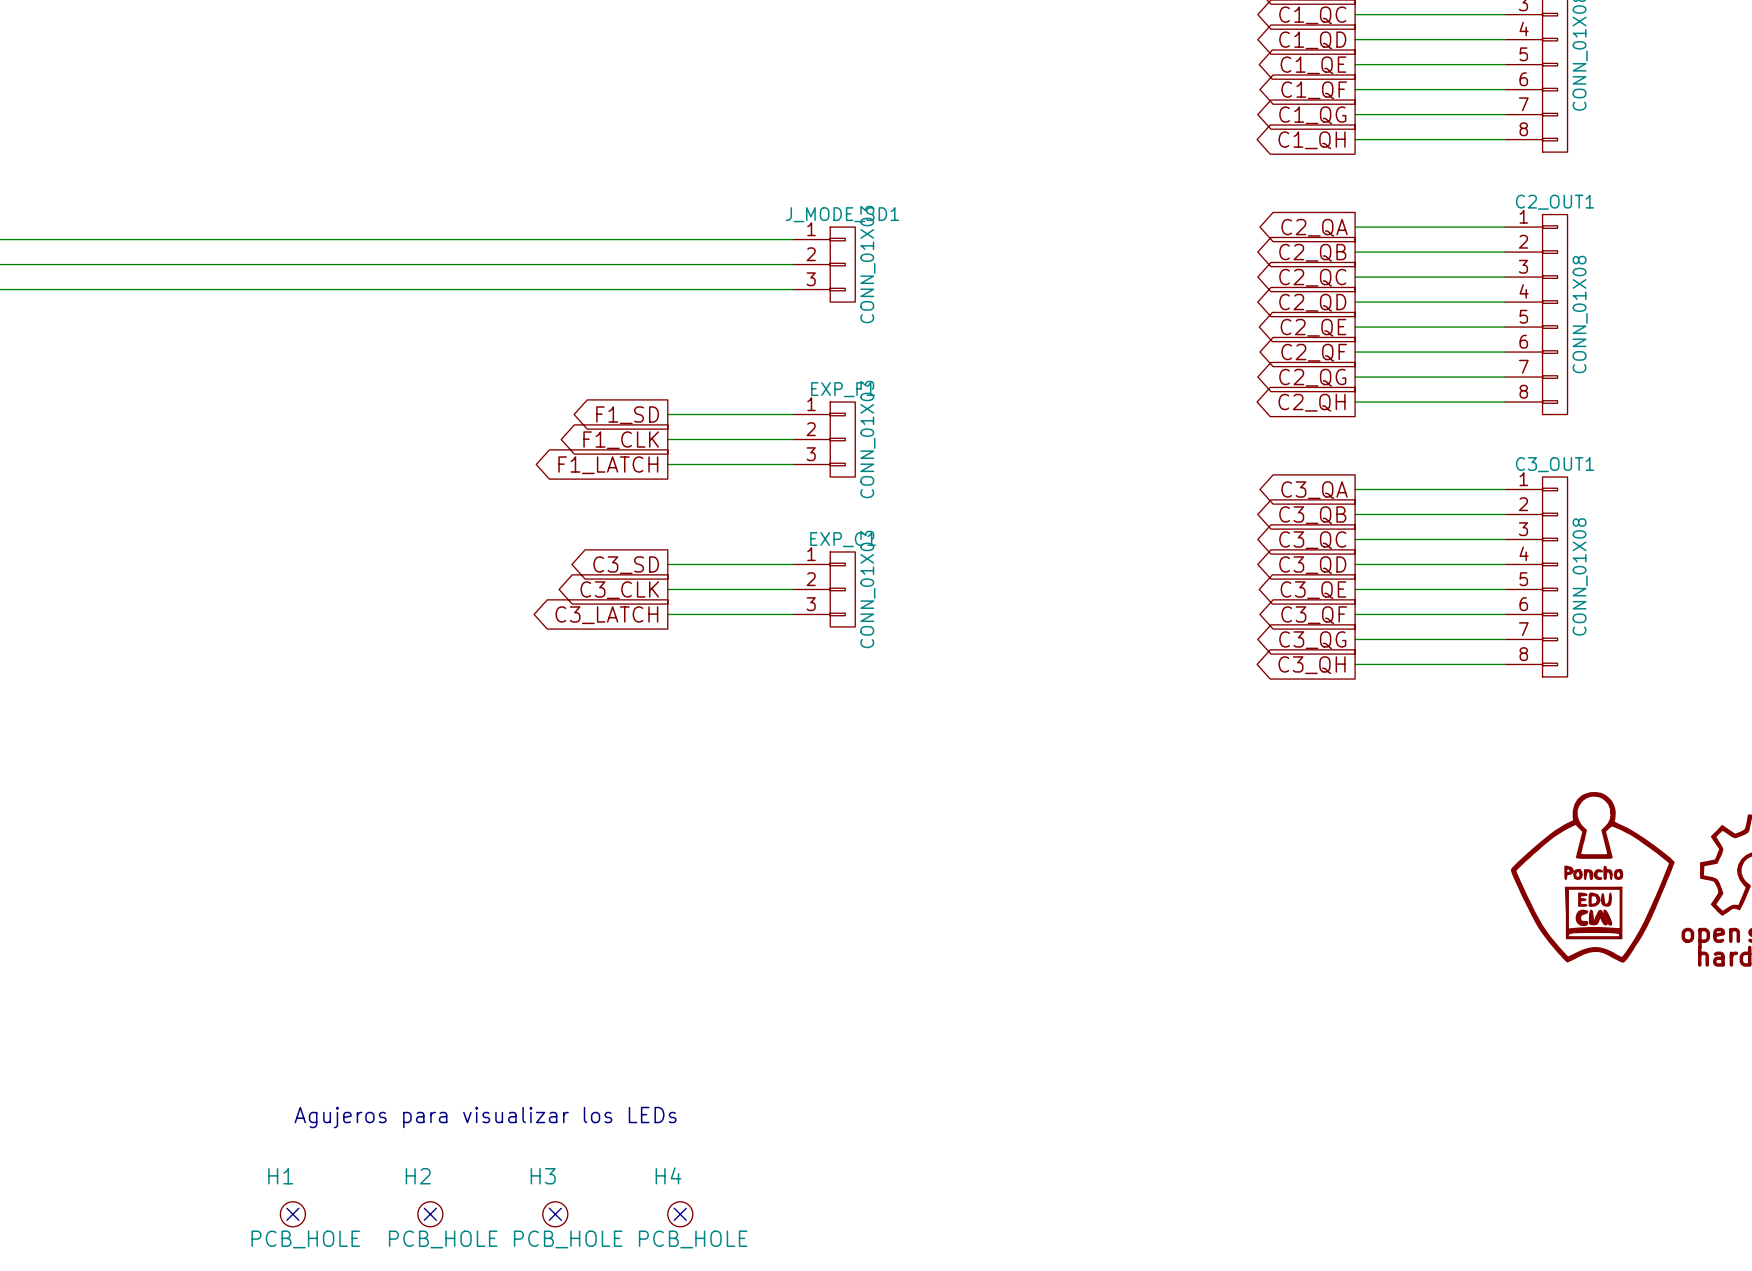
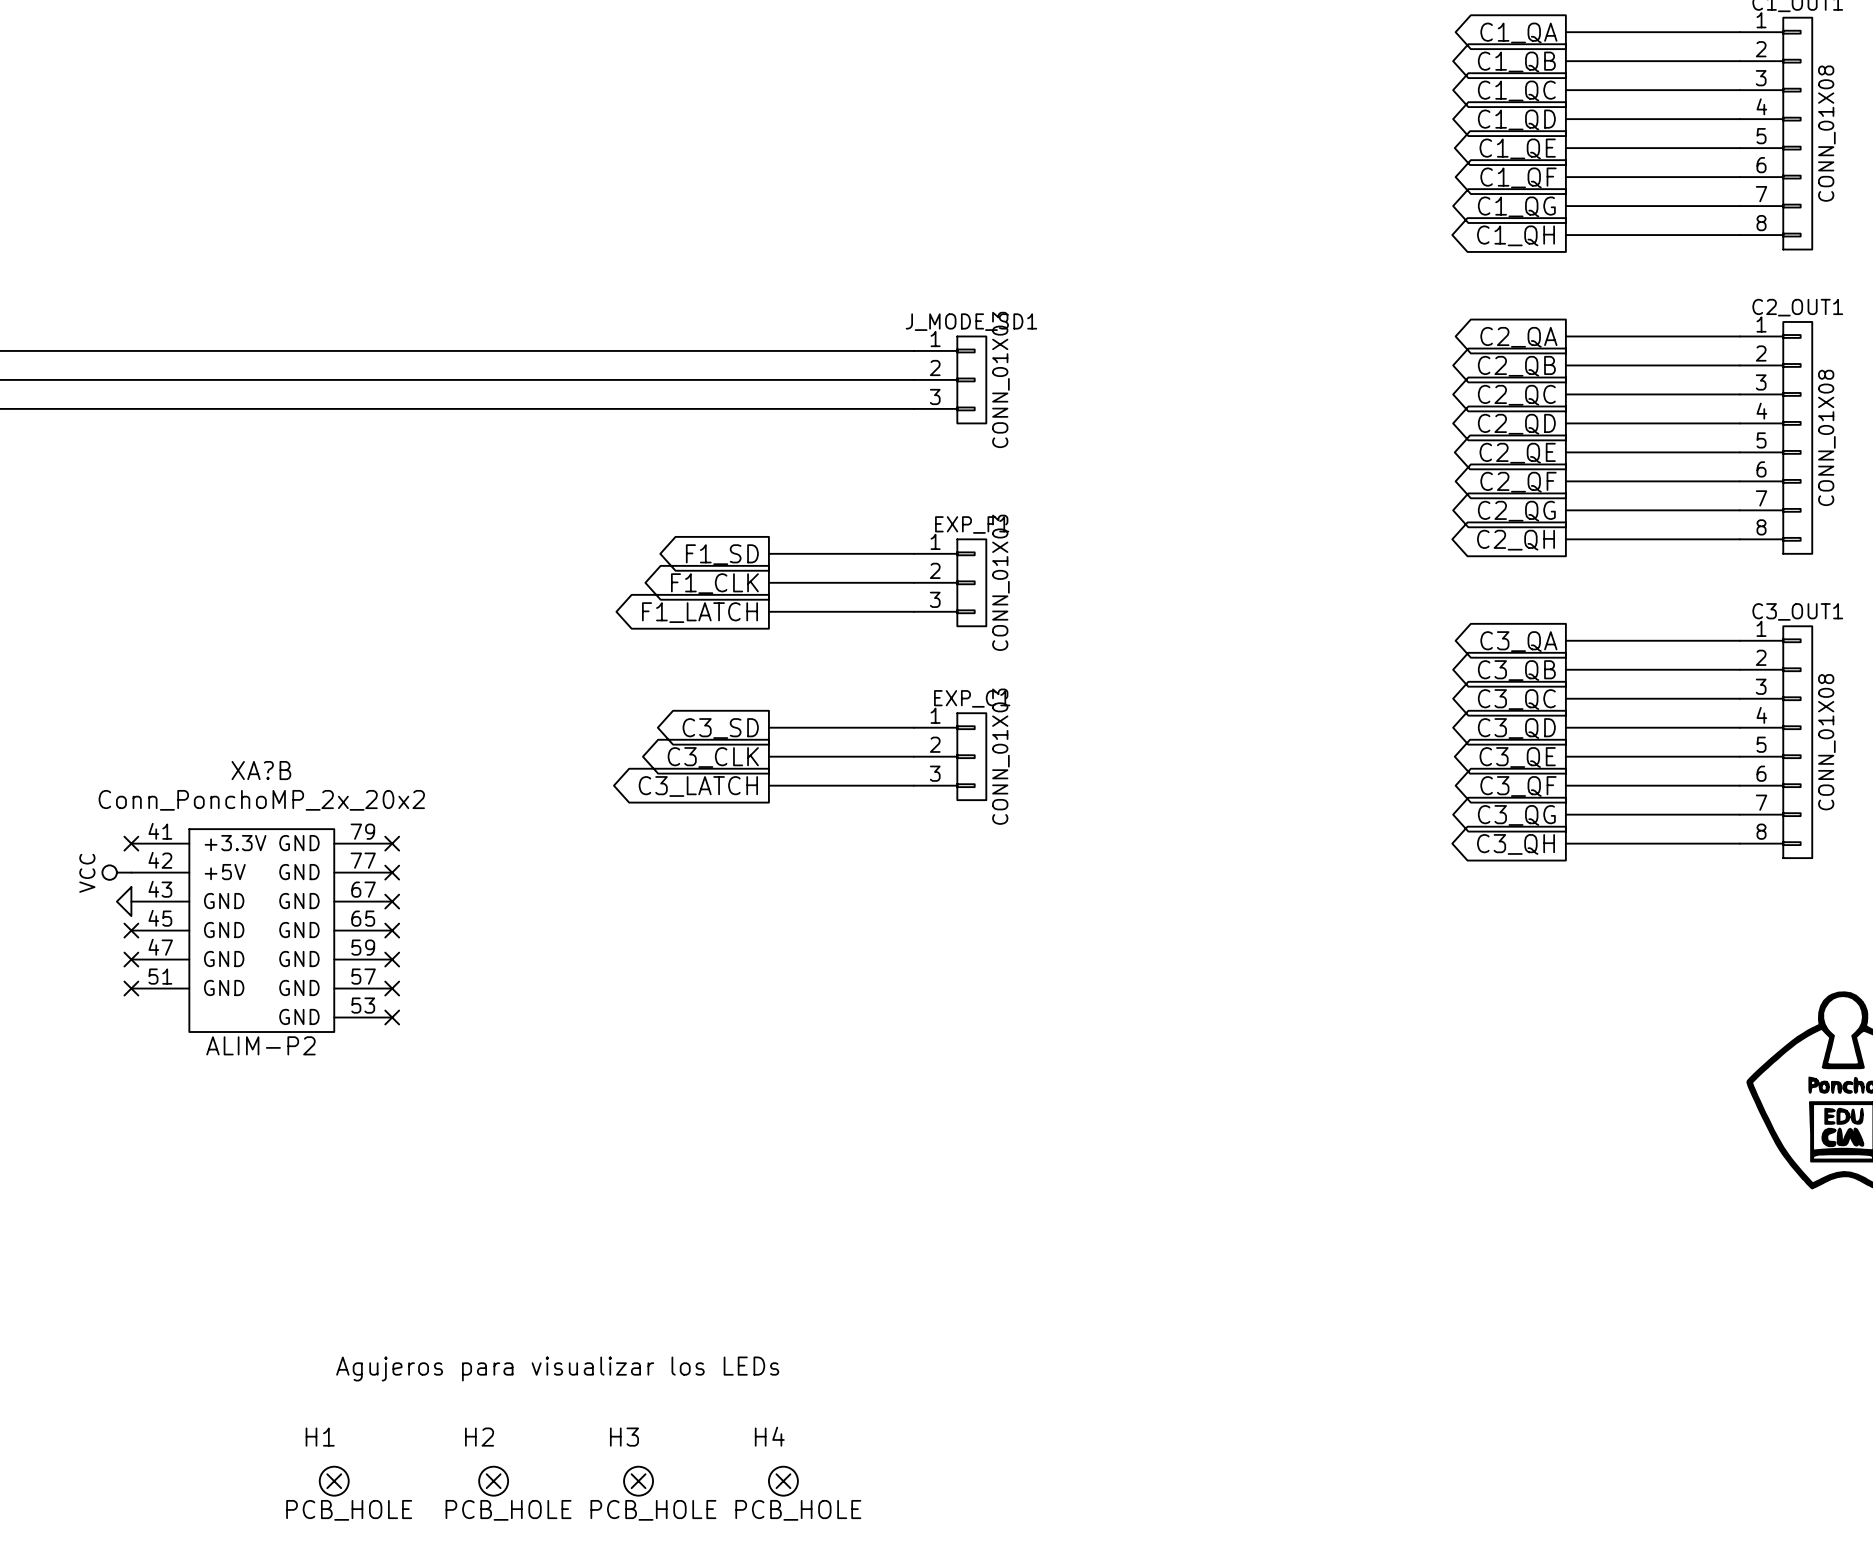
no-connect mark: none -> (131, 843)
no-connect mark: none -> (392, 843)
power symbol: none -> VCC (116, 872)
no-connect mark: none -> (392, 872)
power symbol: none -> (124, 901)
no-connect mark: none -> (392, 901)
no-connect mark: none -> (131, 930)
XA?B: none -> Conn_PonchoMP_2x_20x2 (261, 930)
no-connect mark: none -> (392, 930)
no-connect mark: none -> (131, 959)
no-connect mark: none -> (392, 959)
no-connect mark: none -> (131, 988)
no-connect mark: none -> (392, 988)
no-connect mark: none -> (392, 1017)

